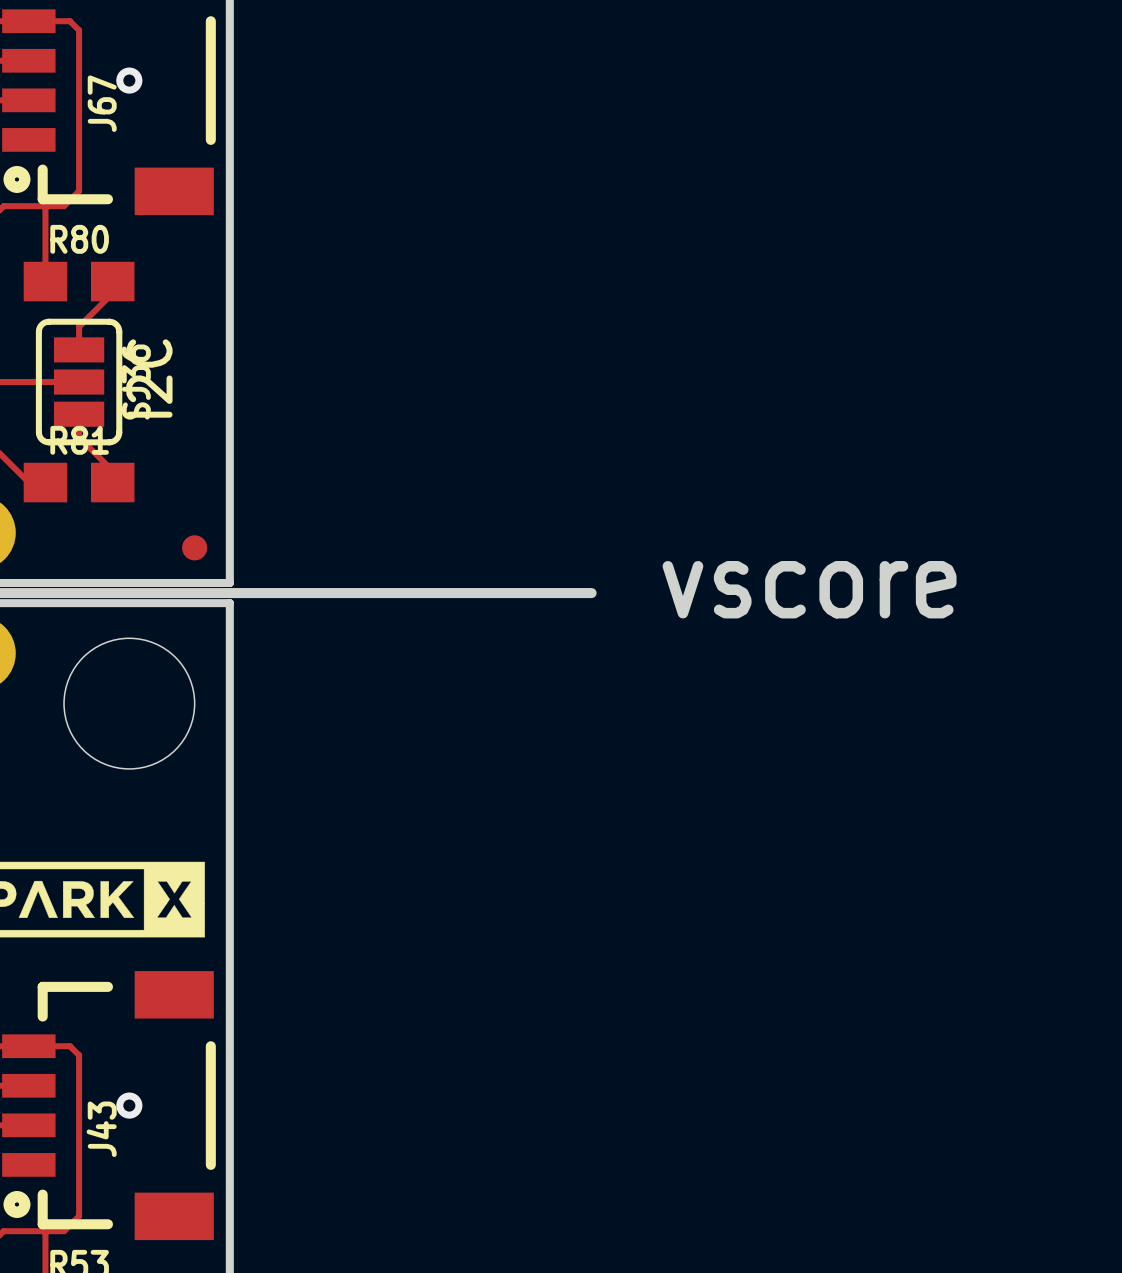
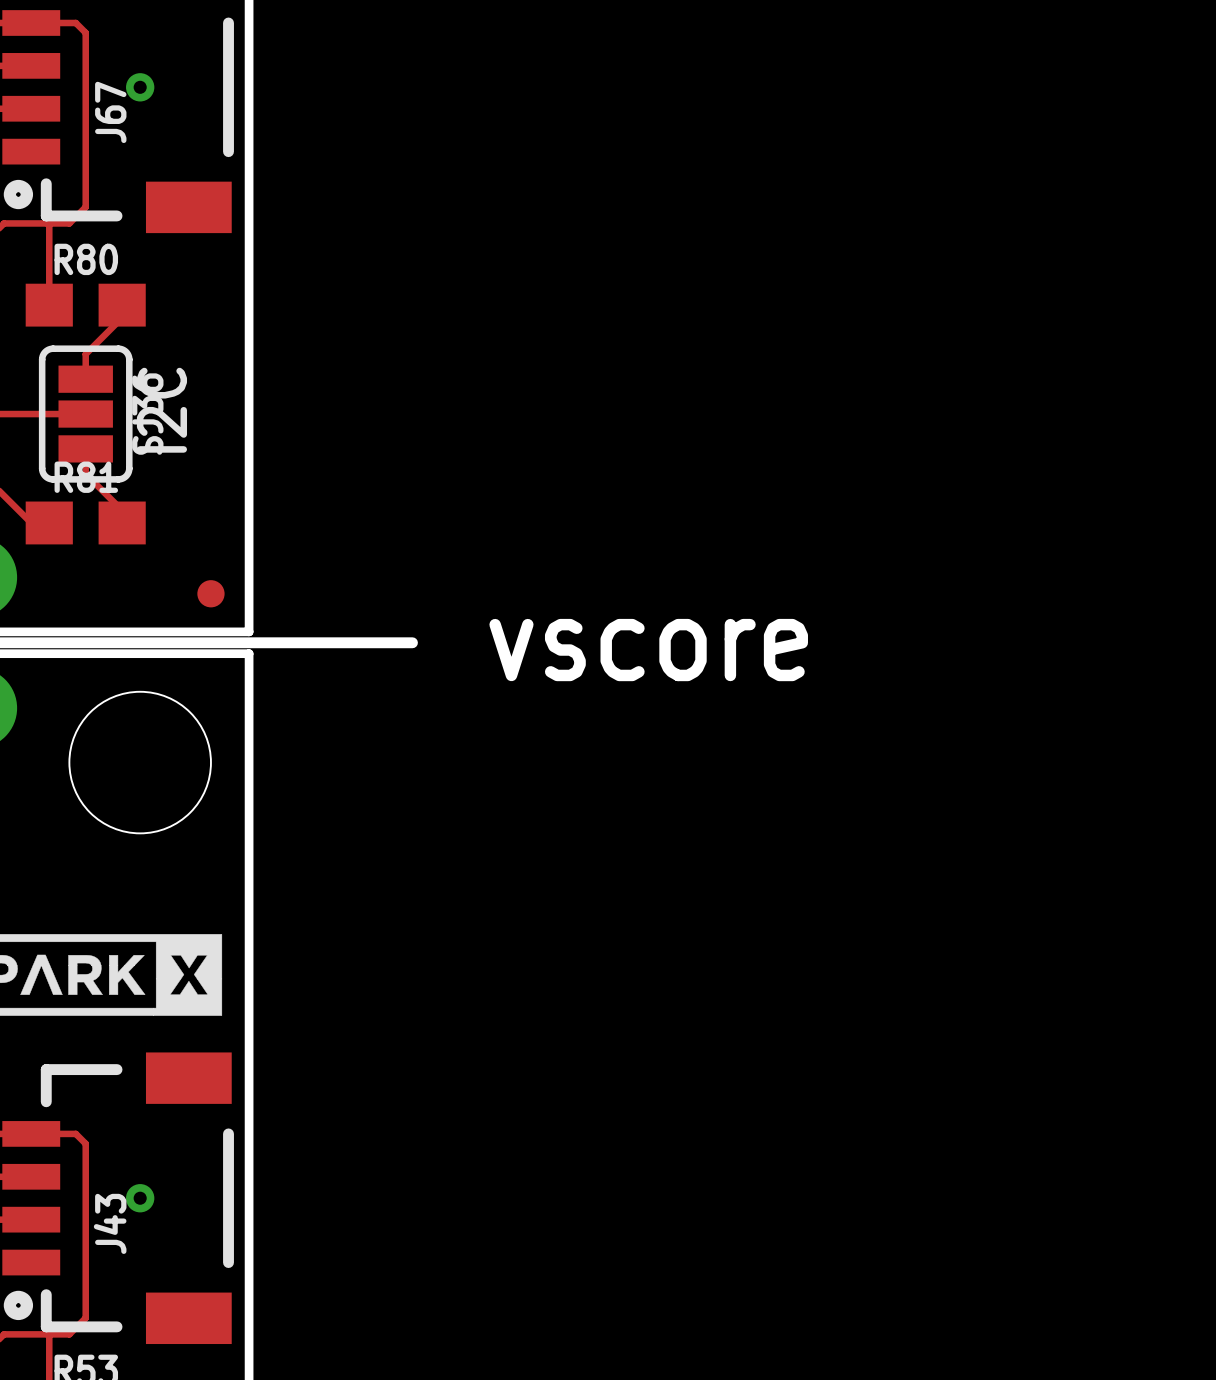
text position: vscore (809, 589) -> vscore (648, 650)
board edge: (380, 593) (591, 593) -> none

